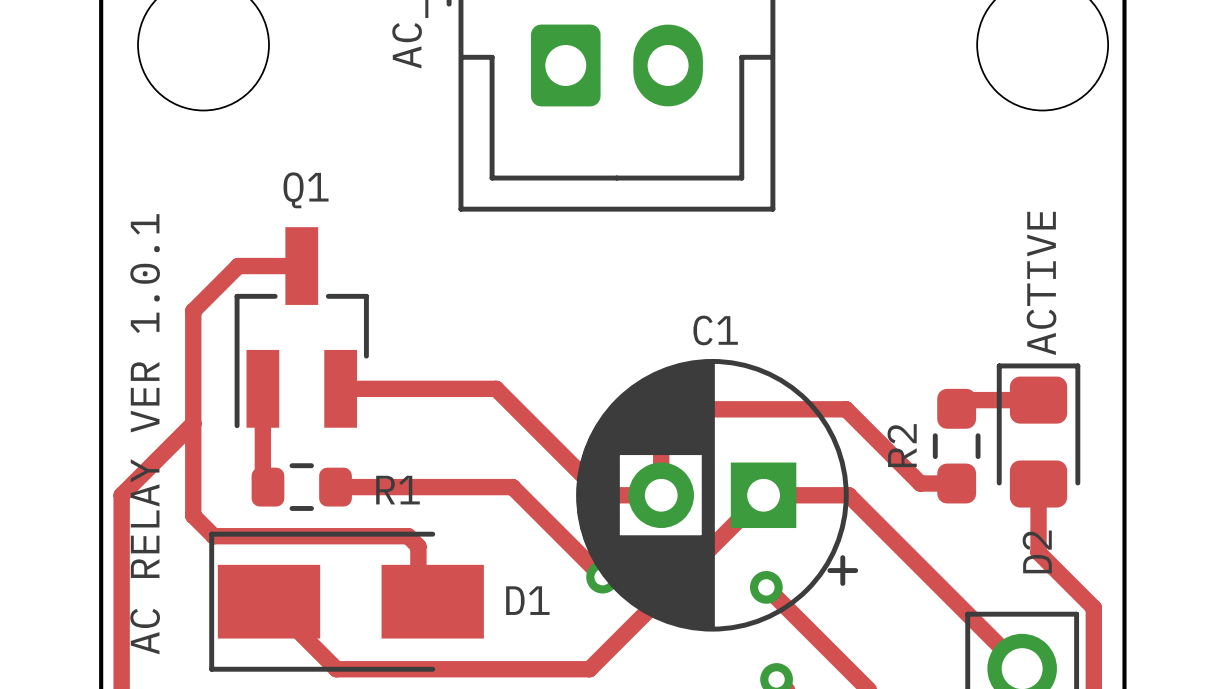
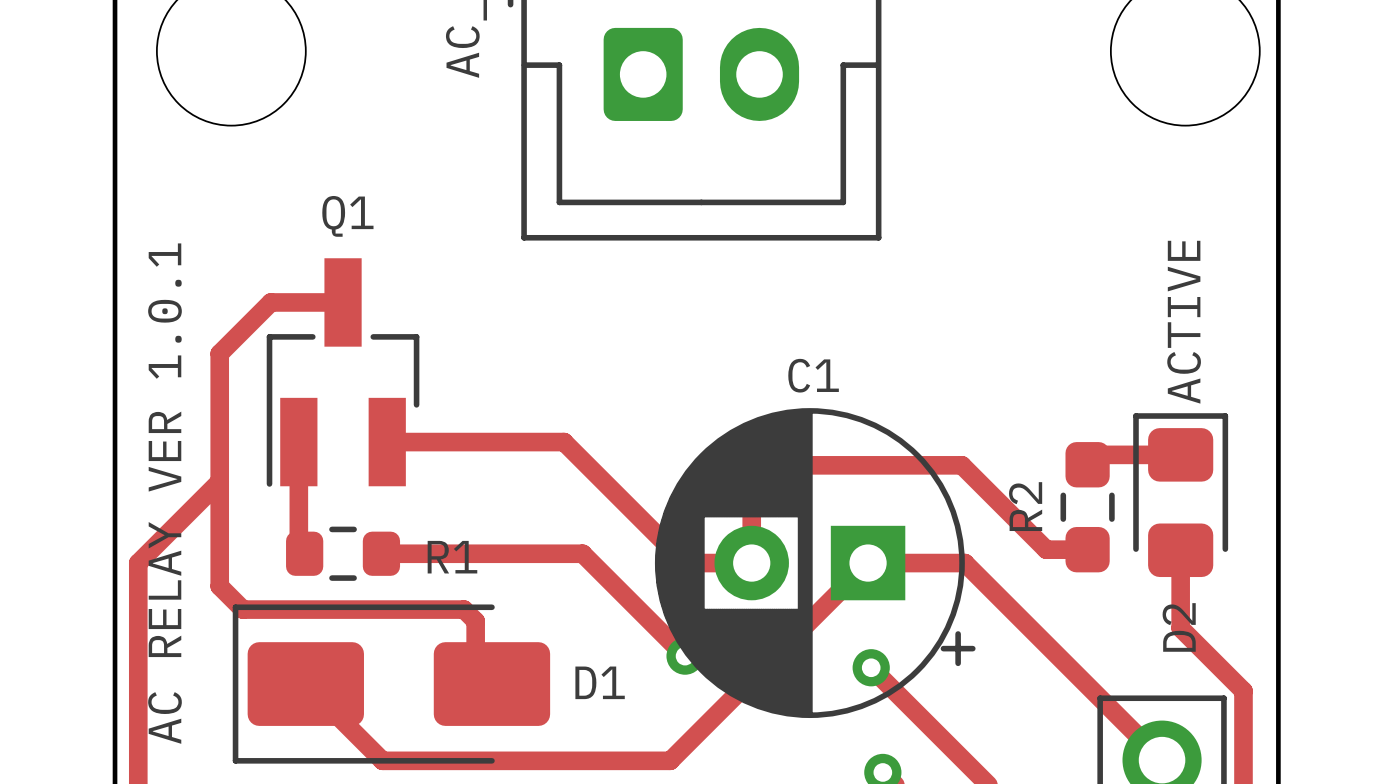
D1 footprint: [209, 531, 484, 672] -> [232, 604, 551, 764]

